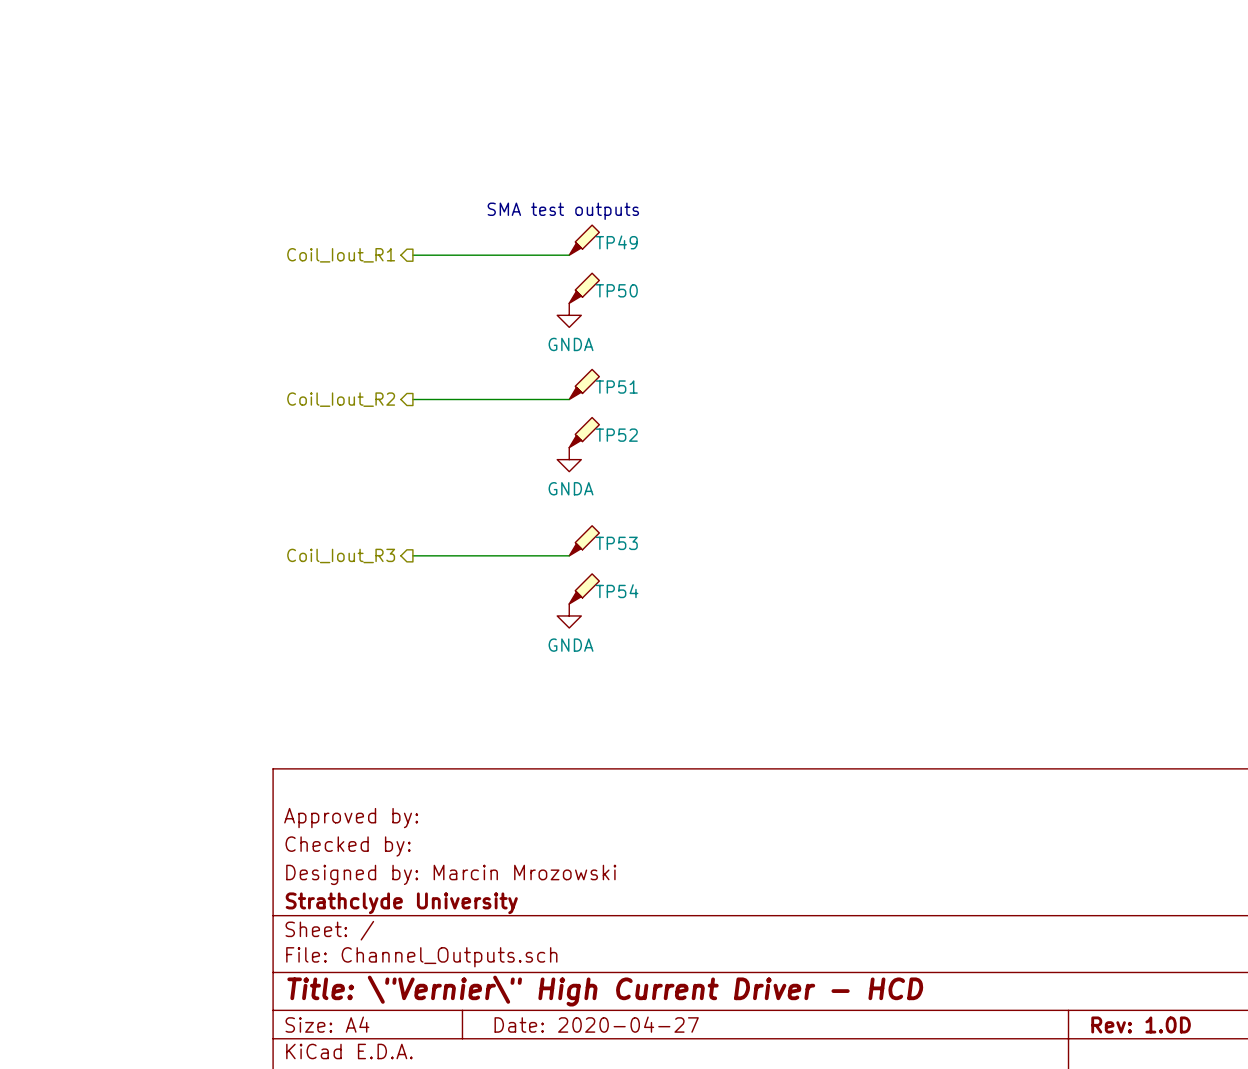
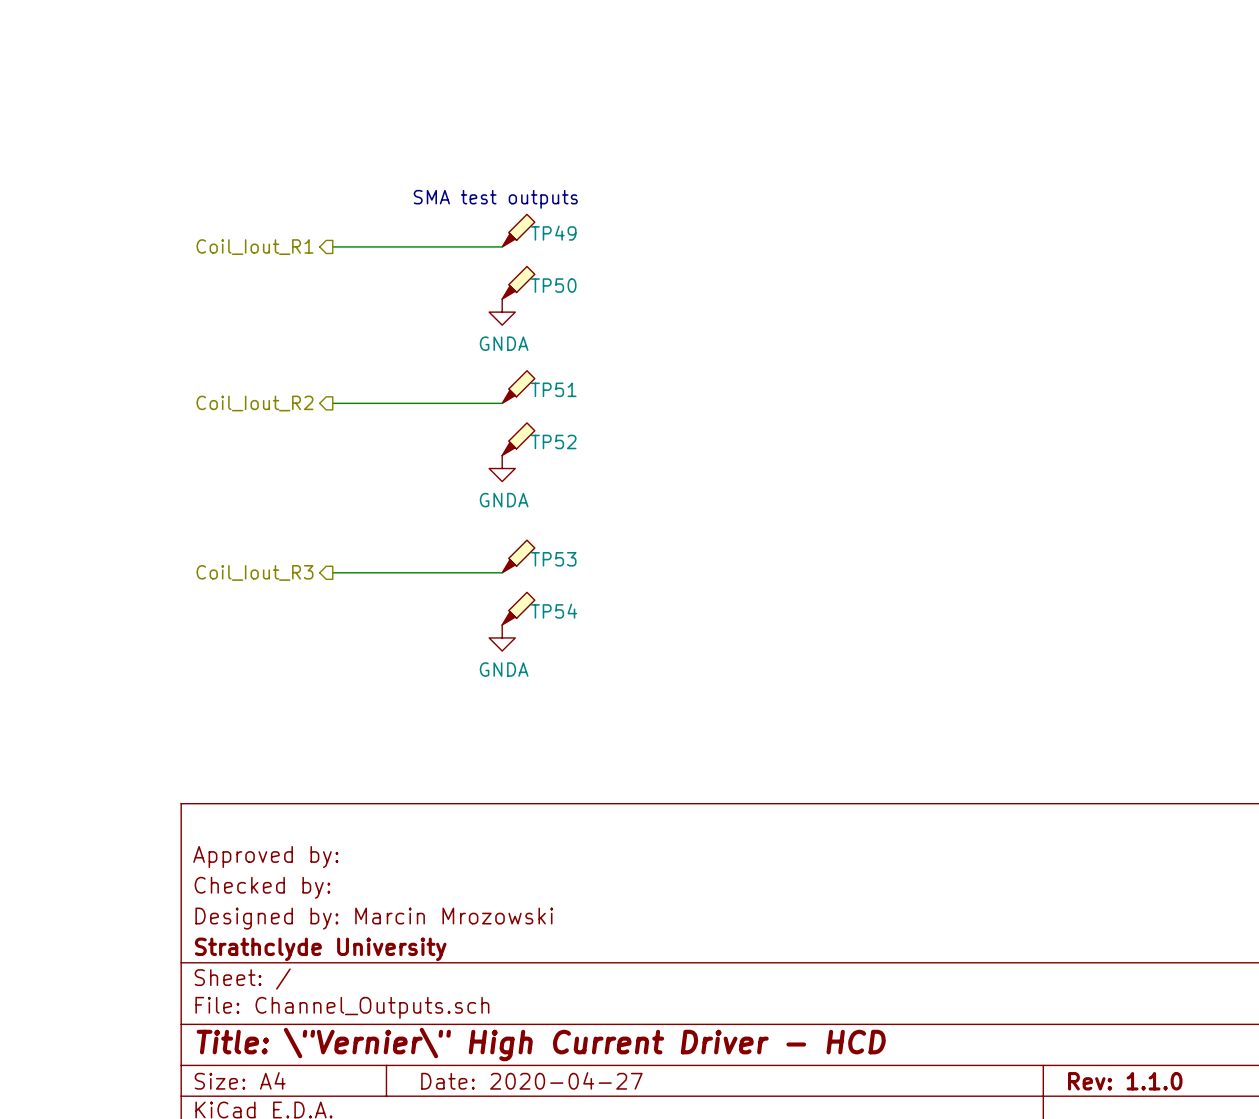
title block: Rev: 1.0D (1141, 1024) -> Rev: 1.1.0 (1125, 1081)

